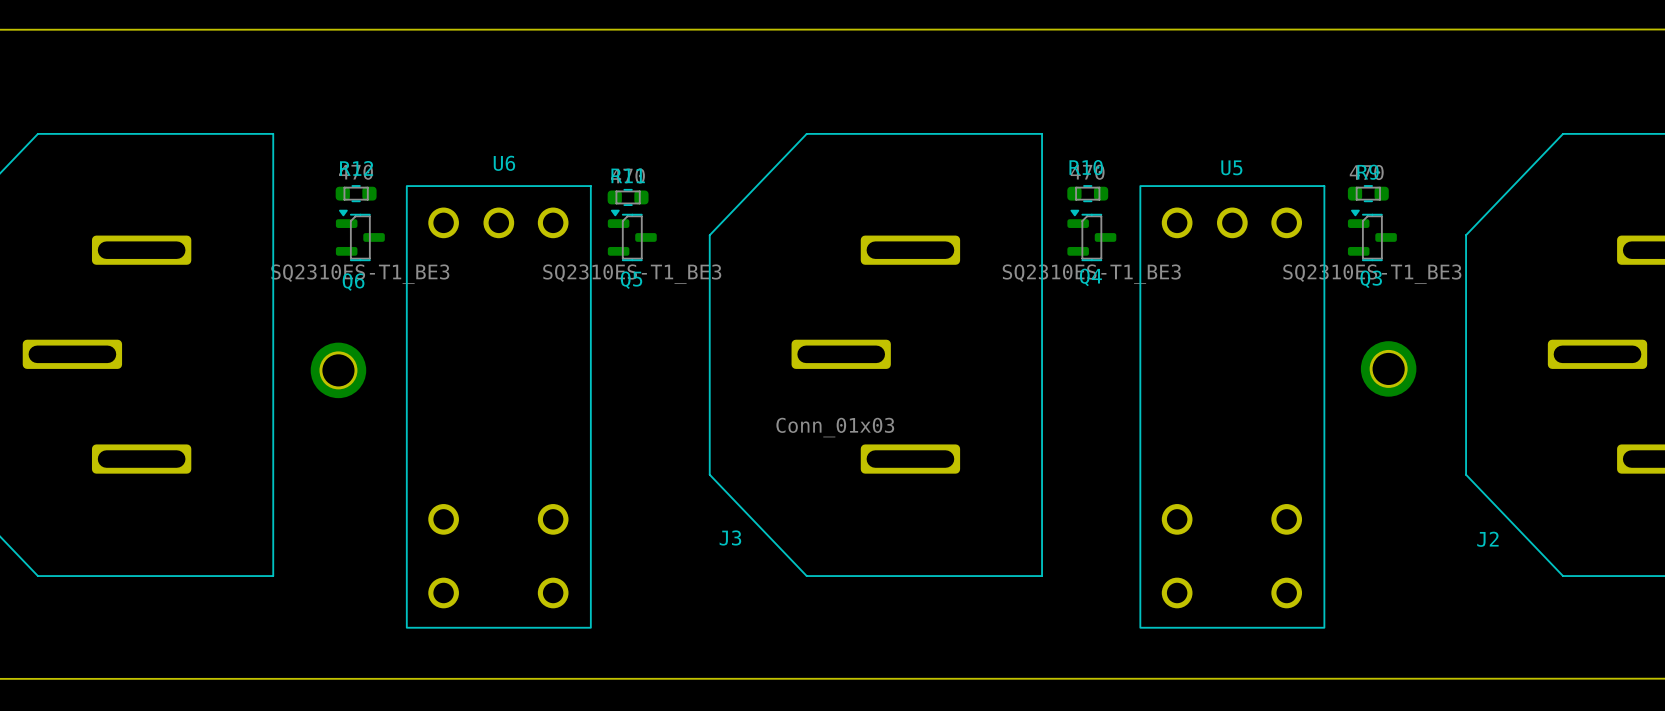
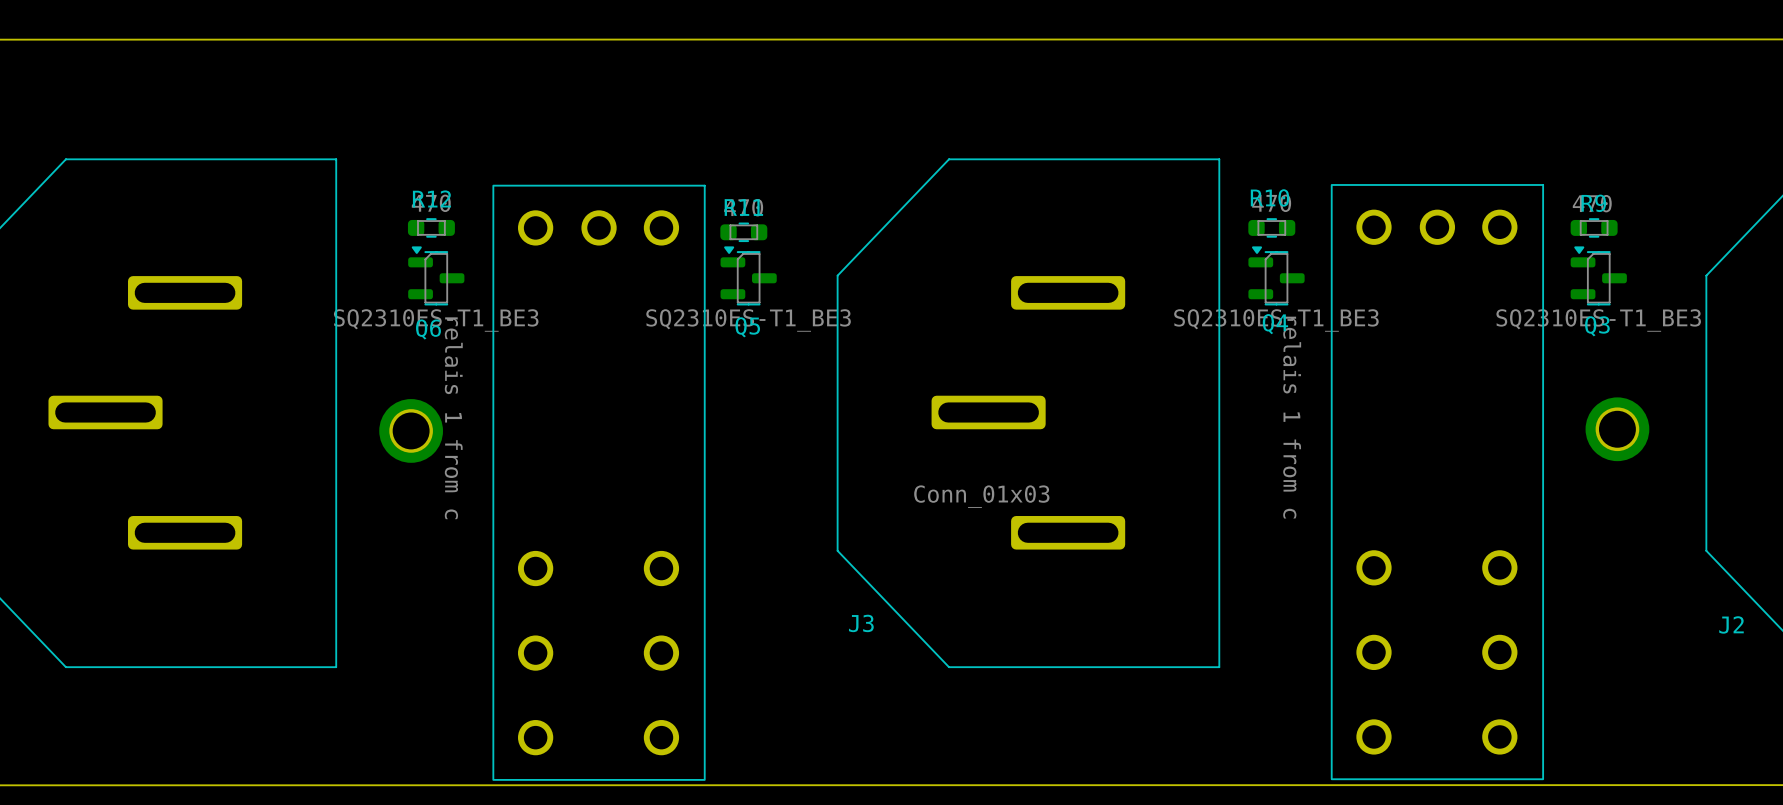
U6: (498, 406) -> none
U5: (1232, 406) -> none
part: none -> (1437, 482)
part: none -> (599, 482)

